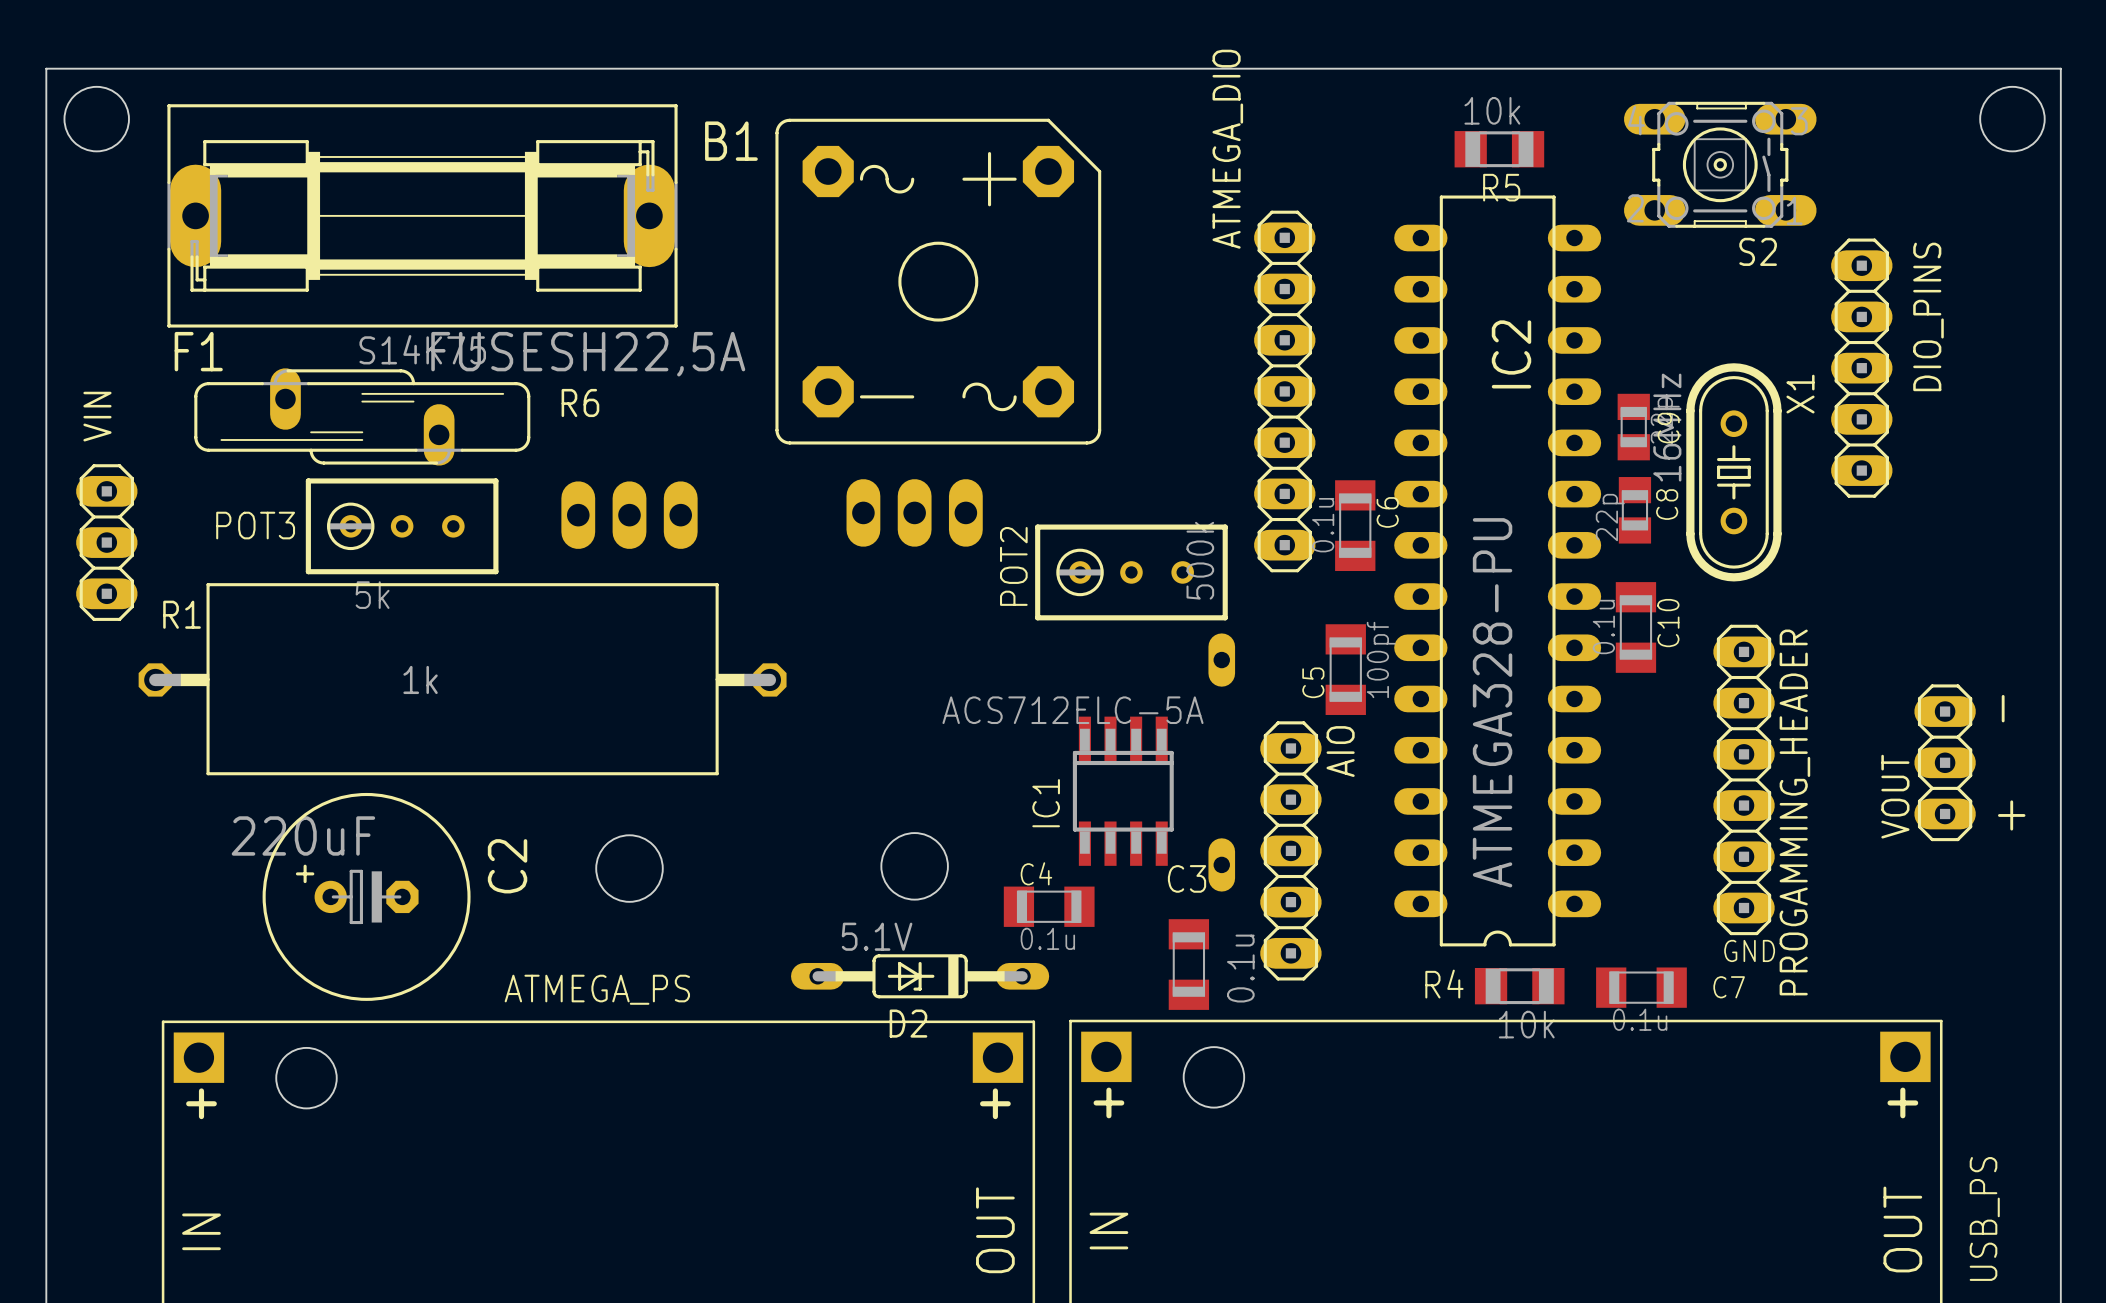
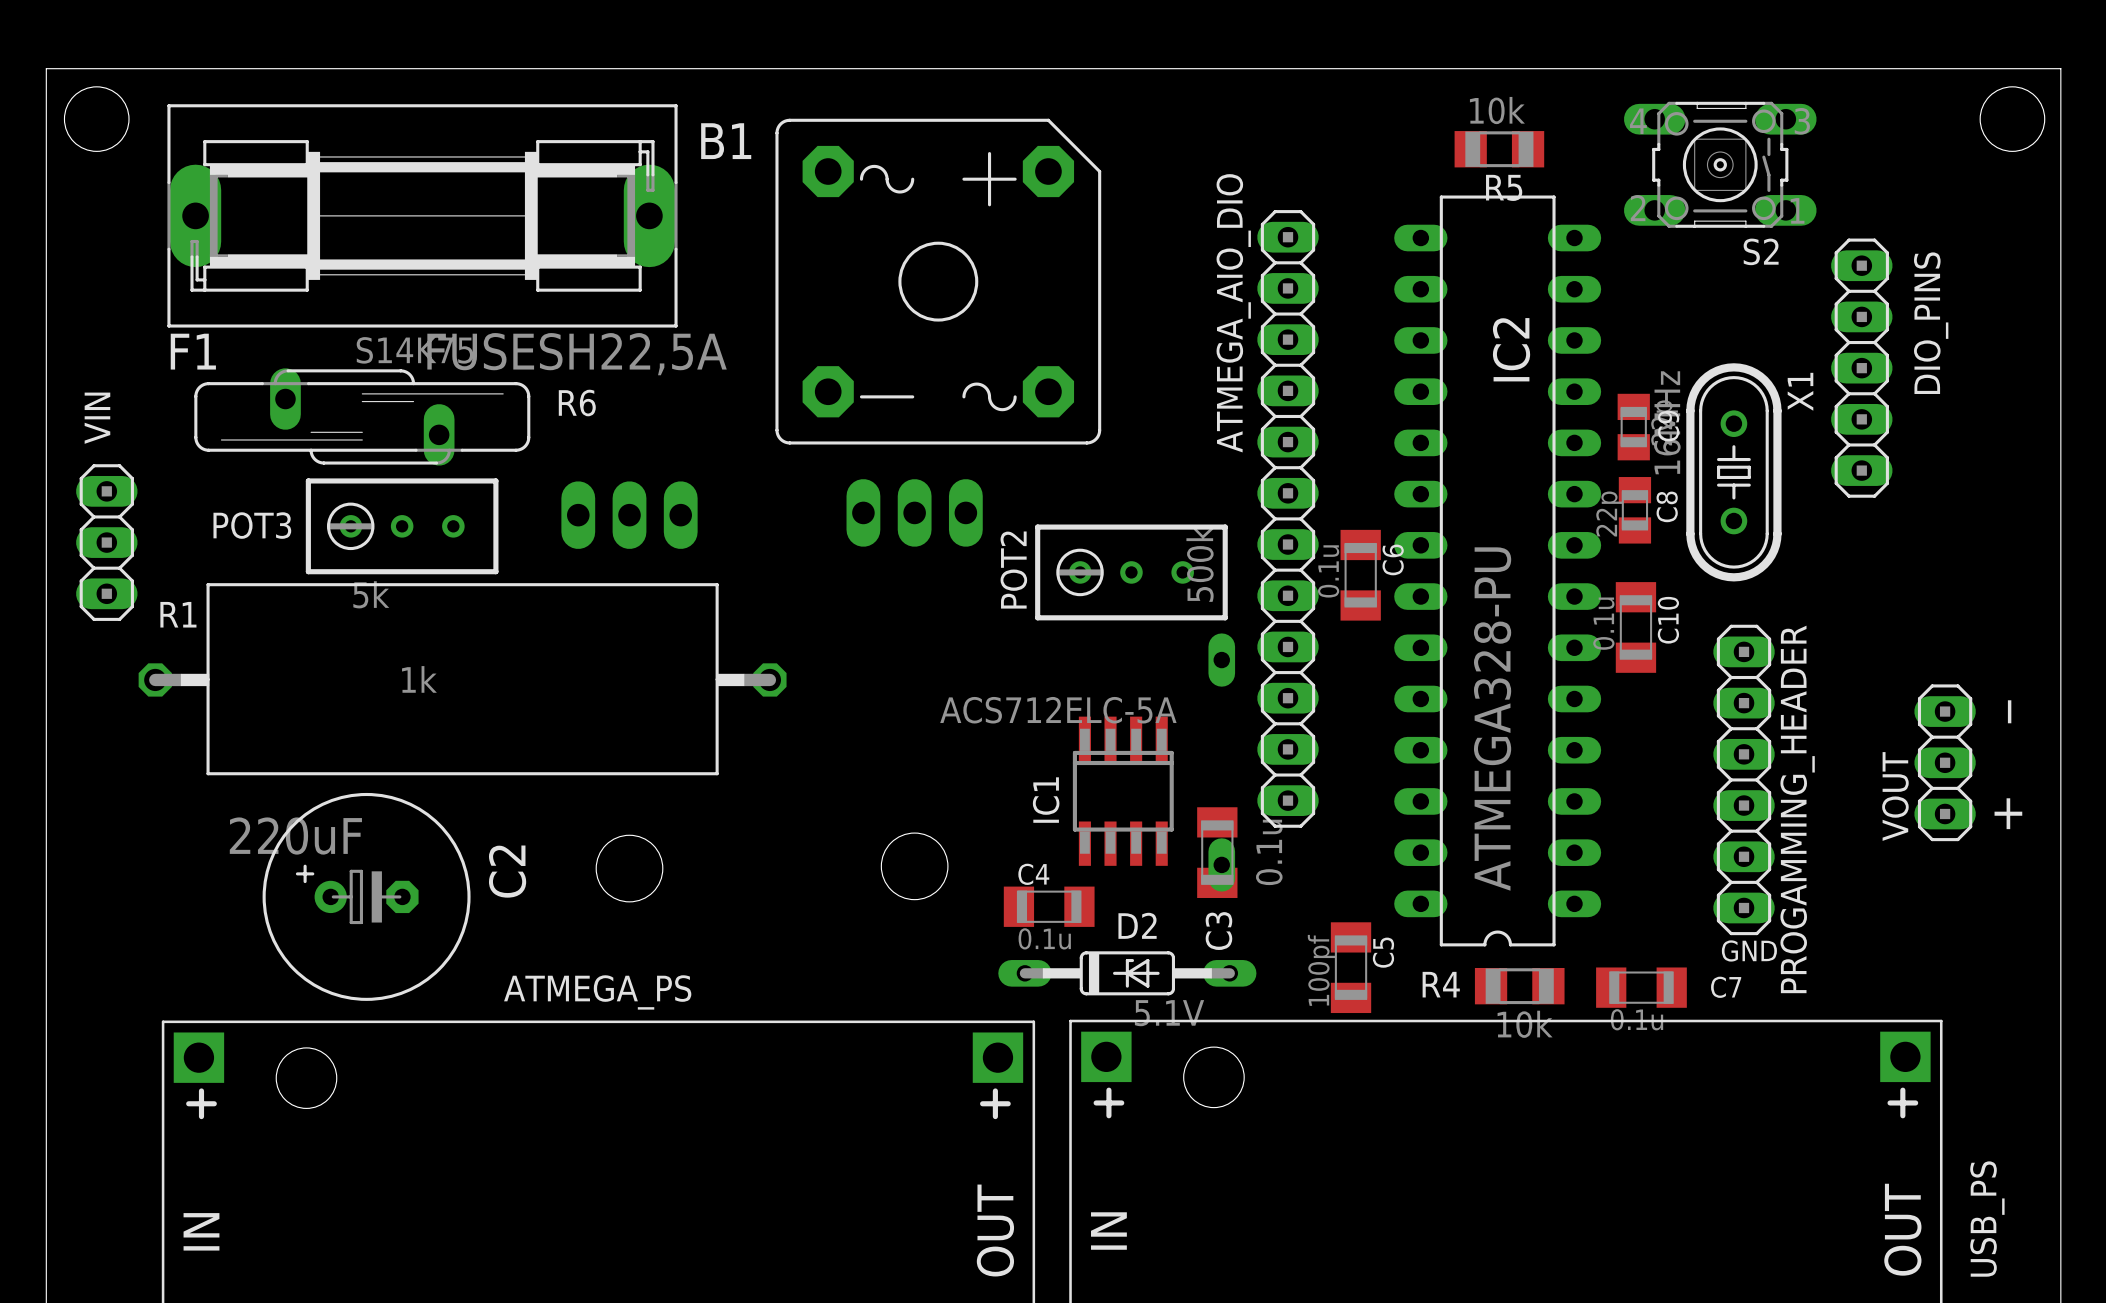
ATMEGA_DIO: (1284, 391) -> none
ATMEGA_AIO_DIO: none -> (1288, 518)
C6 position: (1355, 525) -> (1360, 575)
C5 value position: 100pf (1381, 659) -> 100pf (1321, 970)
C5 position: (1345, 669) -> (1351, 967)
C5 name position: C5 (1313, 682) -> C5 (1383, 952)
AIO: (1290, 850) -> none
C3 name rotation: 0° (1187, 878) -> 90° counterclockwise (1218, 931)
C3 name position: C3 (1187, 878) -> C3 (1218, 931)
C3 position: (1188, 964) -> (1217, 852)
D2 rotation: 0° (920, 976) -> 180° (1127, 973)
D2 position: (920, 976) -> (1127, 973)

